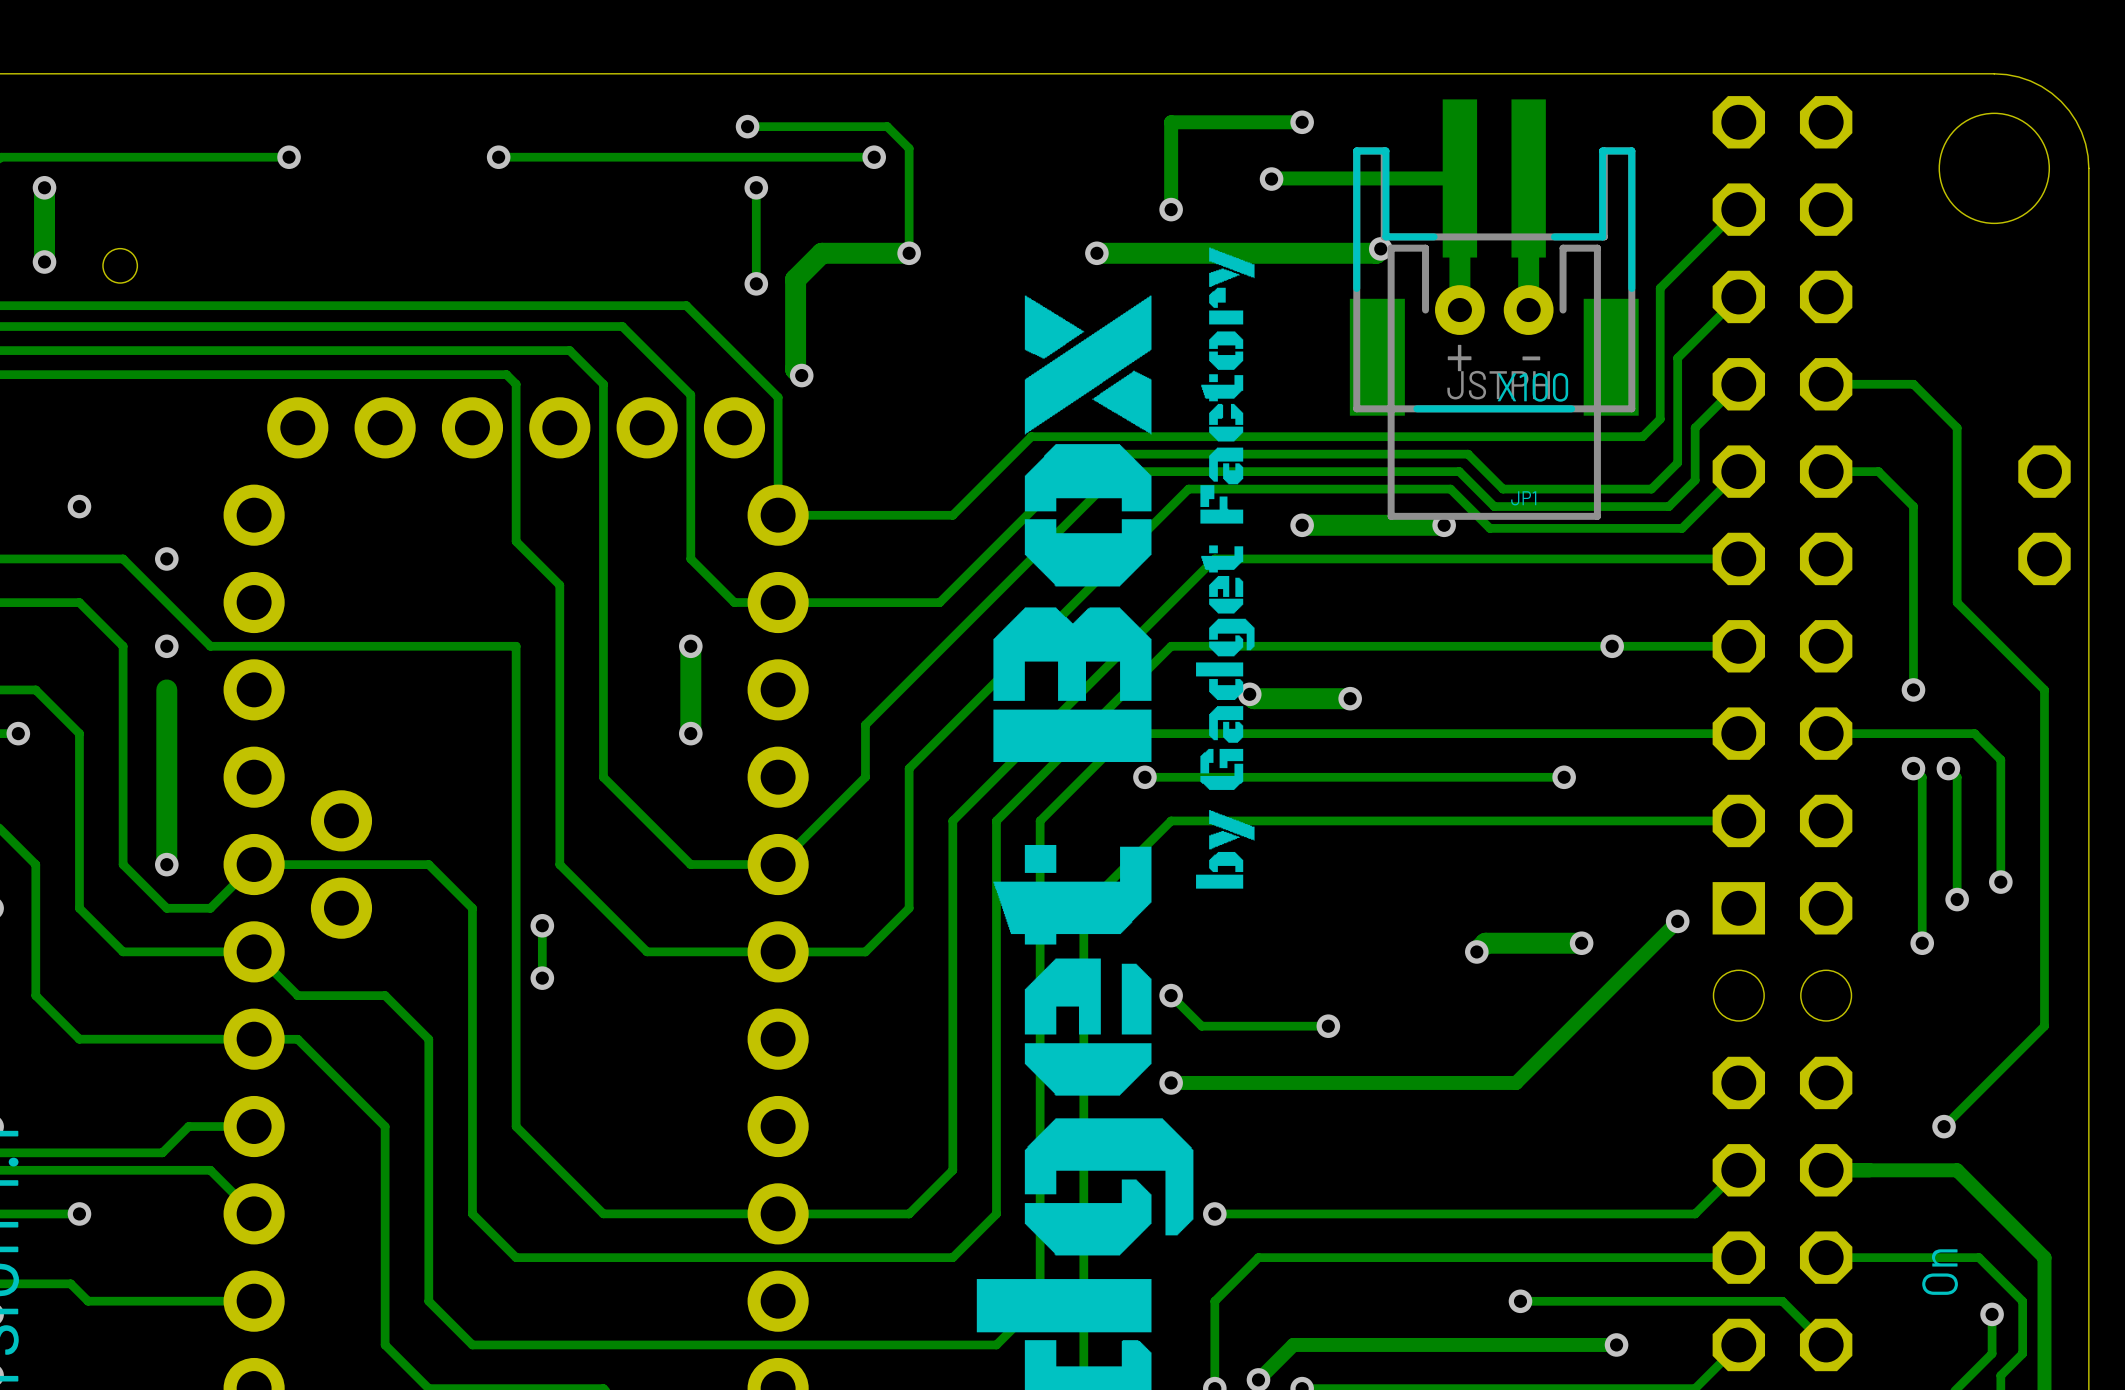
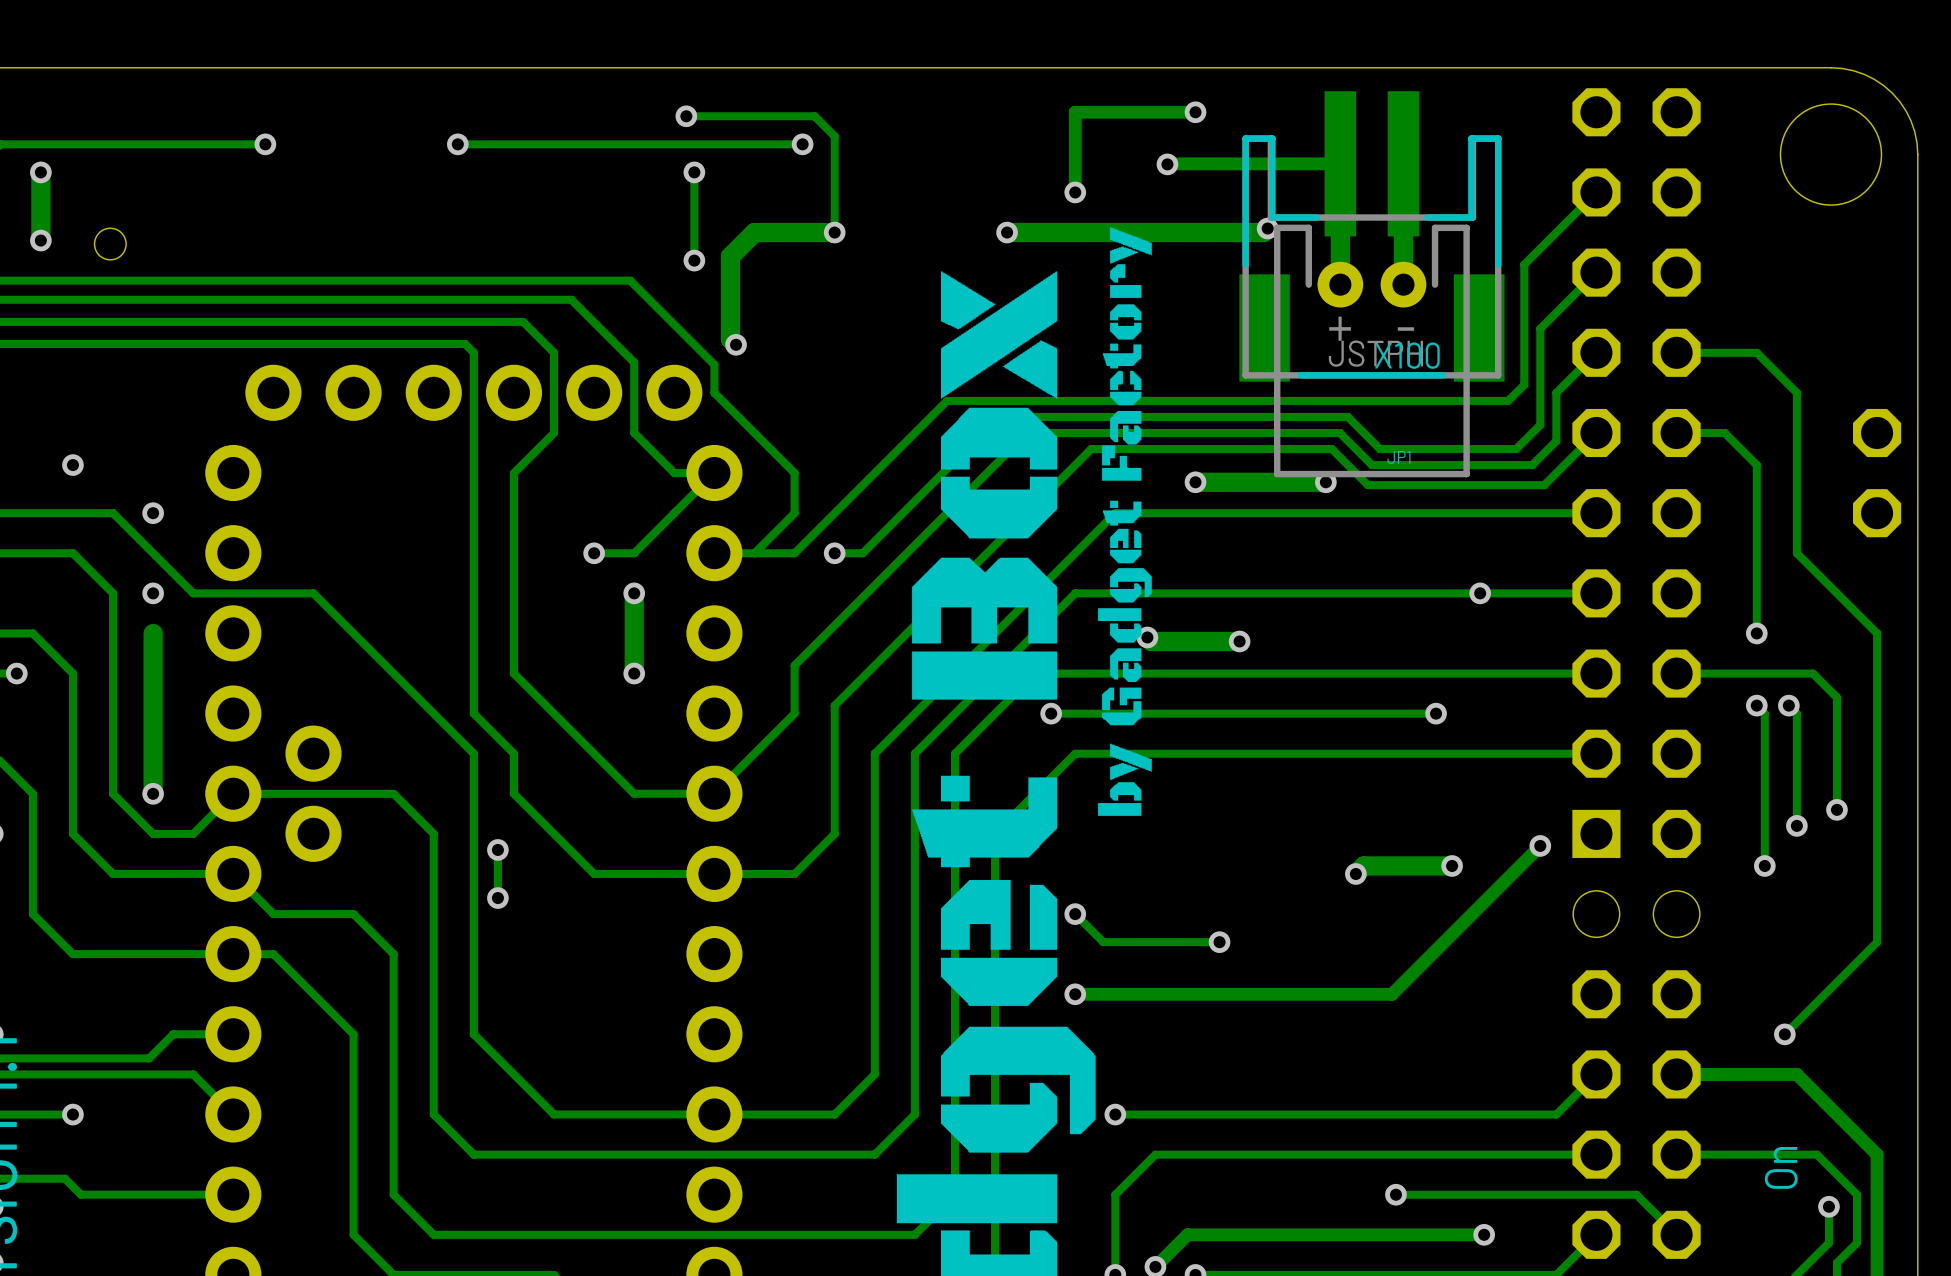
track: (778, 427) (778, 515) (952, 515) -> (714, 392) (794, 473) (794, 513) (754, 553)
track: (603, 471) (603, 777) -> (554, 433) (513, 473) (513, 537)
track: (690, 471) (690, 558) (734, 602) (778, 602) -> (634, 433) (674, 473) (714, 473) (634, 553) (594, 553)
track: (516, 541) (559, 585) -> (473, 497) (473, 593)
via: none -> (594, 553)
track: (909, 602) (865, 602) -> (874, 473) (794, 553)
via: none -> (834, 553)
track: (516, 646) (341, 646) -> (473, 753) (313, 593)
track: (559, 733) (559, 820) -> (513, 673) (554, 713)
track: (516, 777) (516, 820) -> (473, 713) (513, 753)

